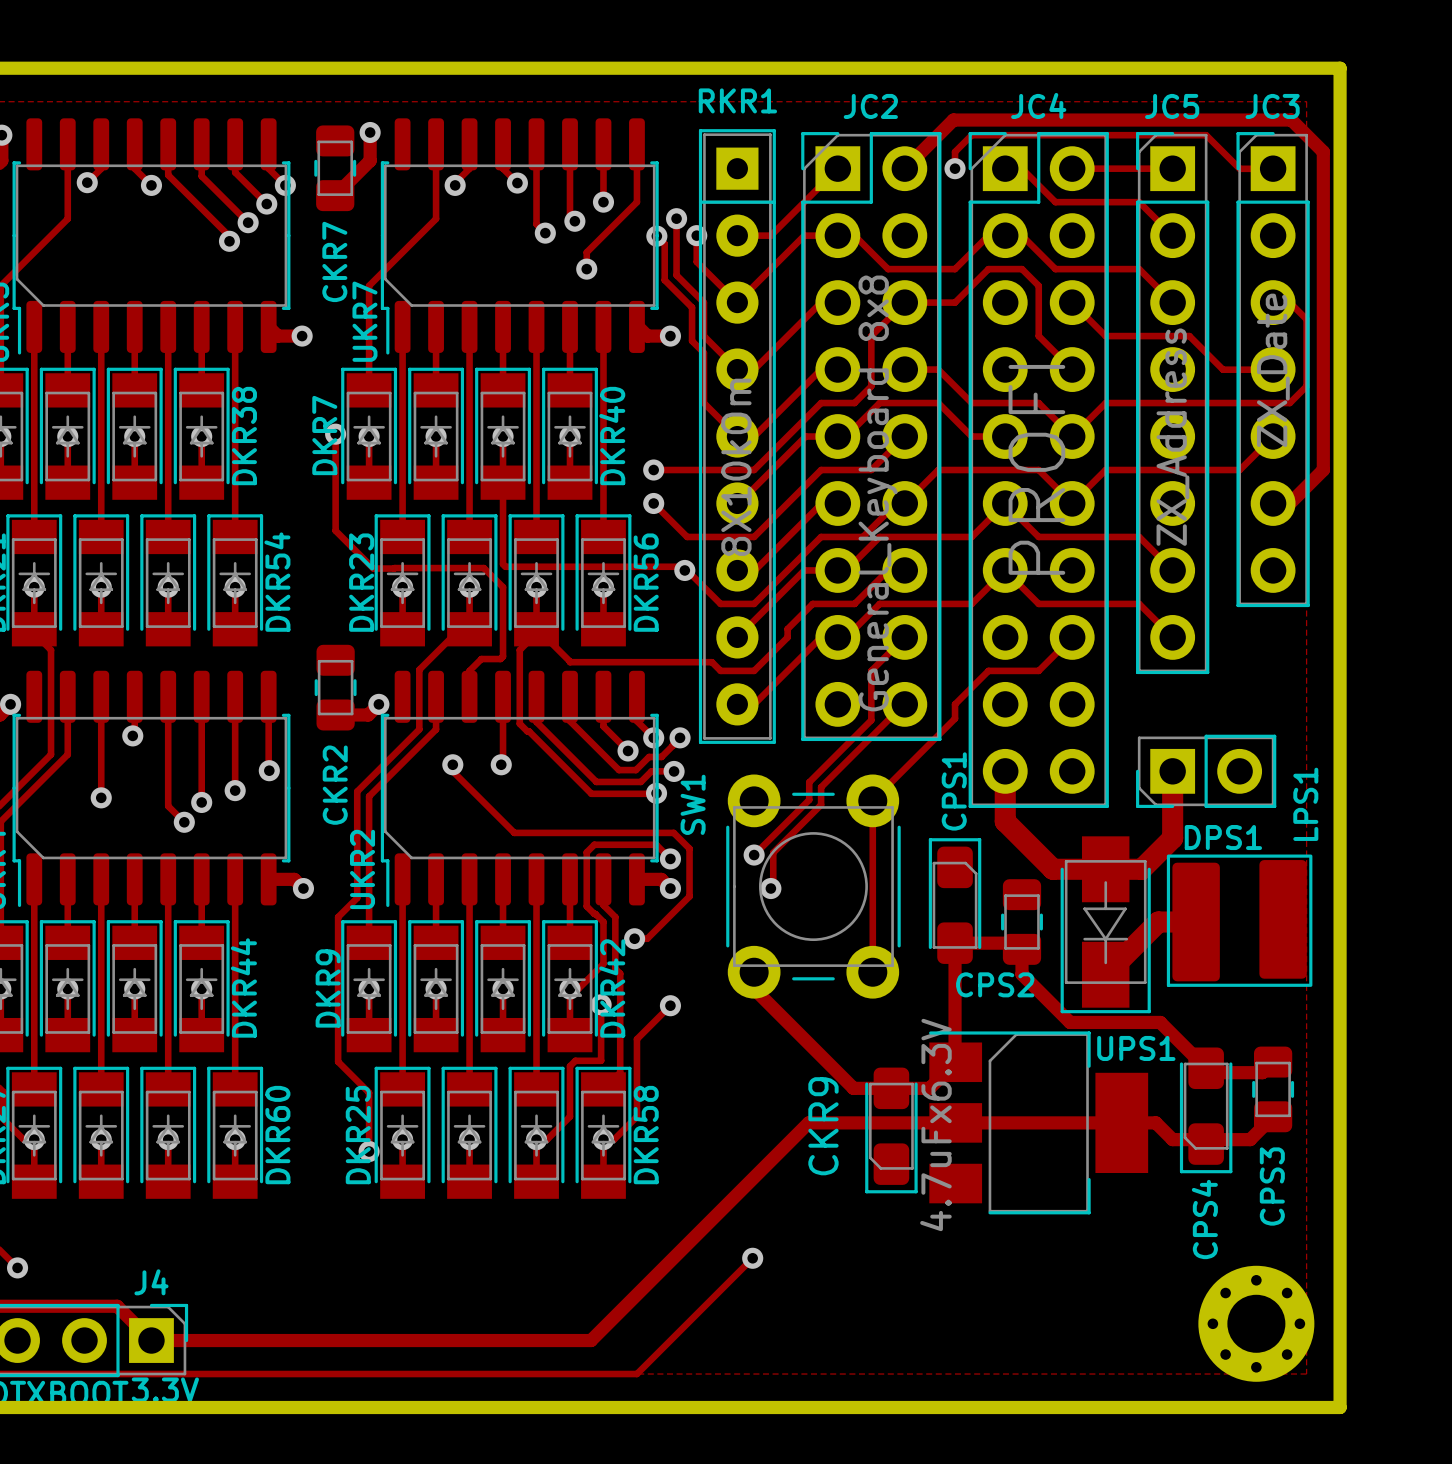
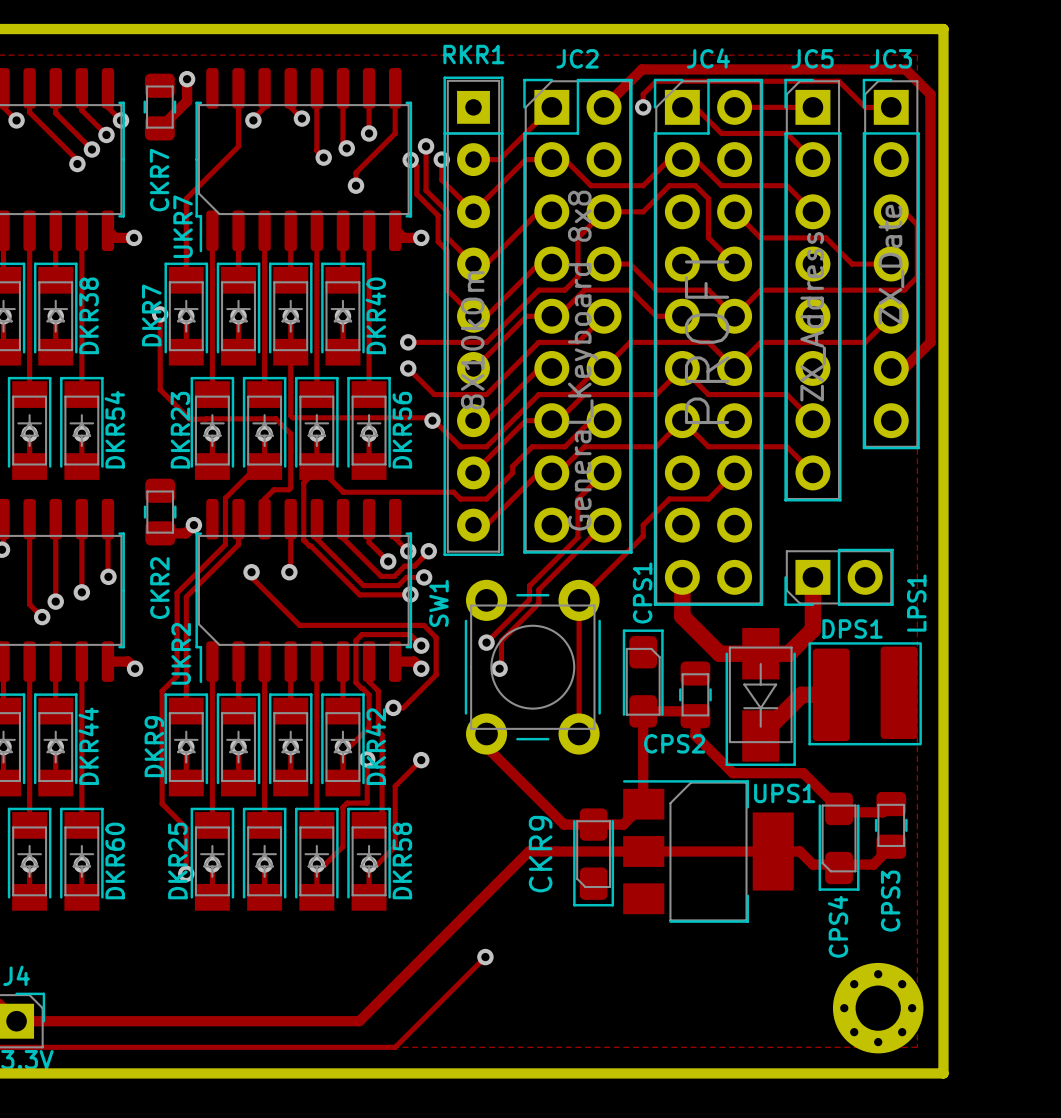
CKR9 value: 4.7uFx6.3V (935, 1124) -> none

